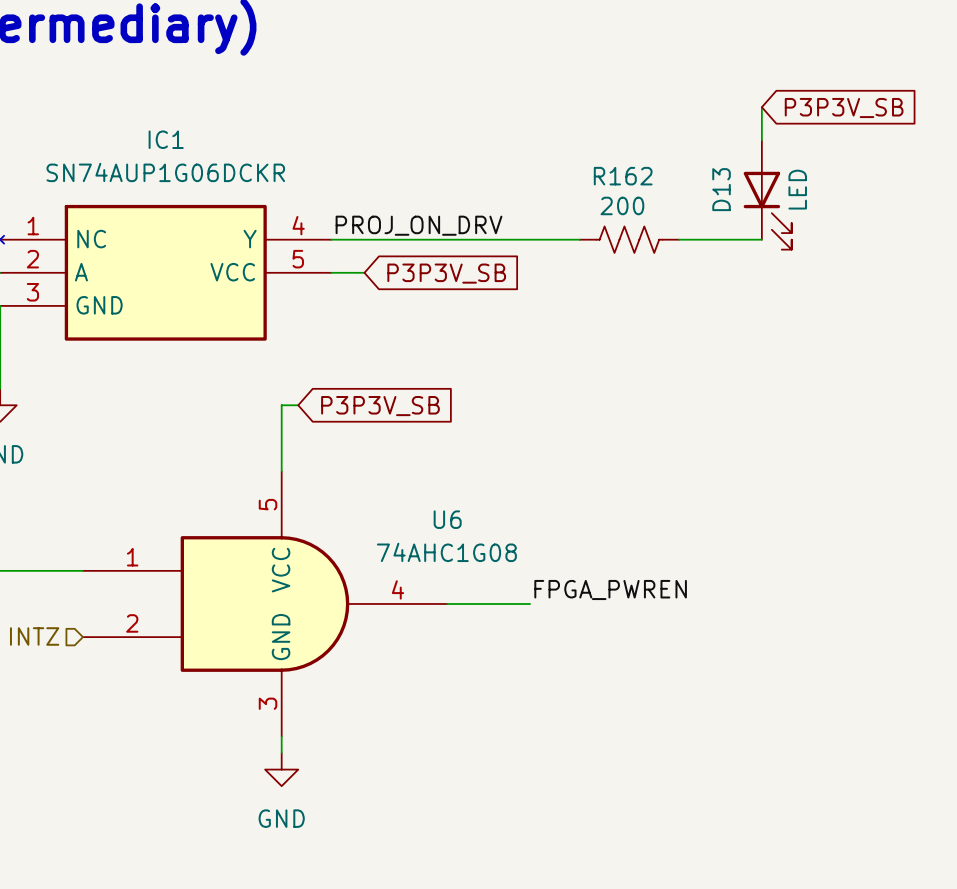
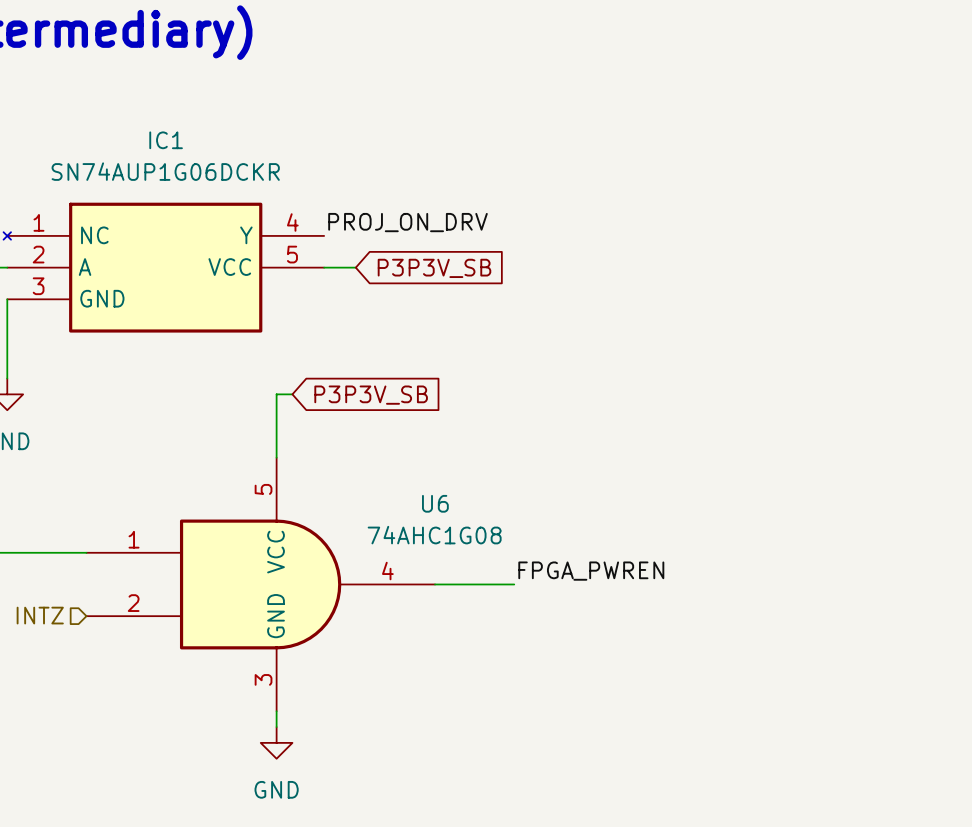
wire: (761, 107) (761, 140) -> none
global label: P3P3V_SB (844, 108) -> none
D13: LED (767, 194) -> none
wire: (331, 239) (579, 239) -> none
R162: 200 (629, 239) -> none
wire: (679, 239) (761, 239) -> none

